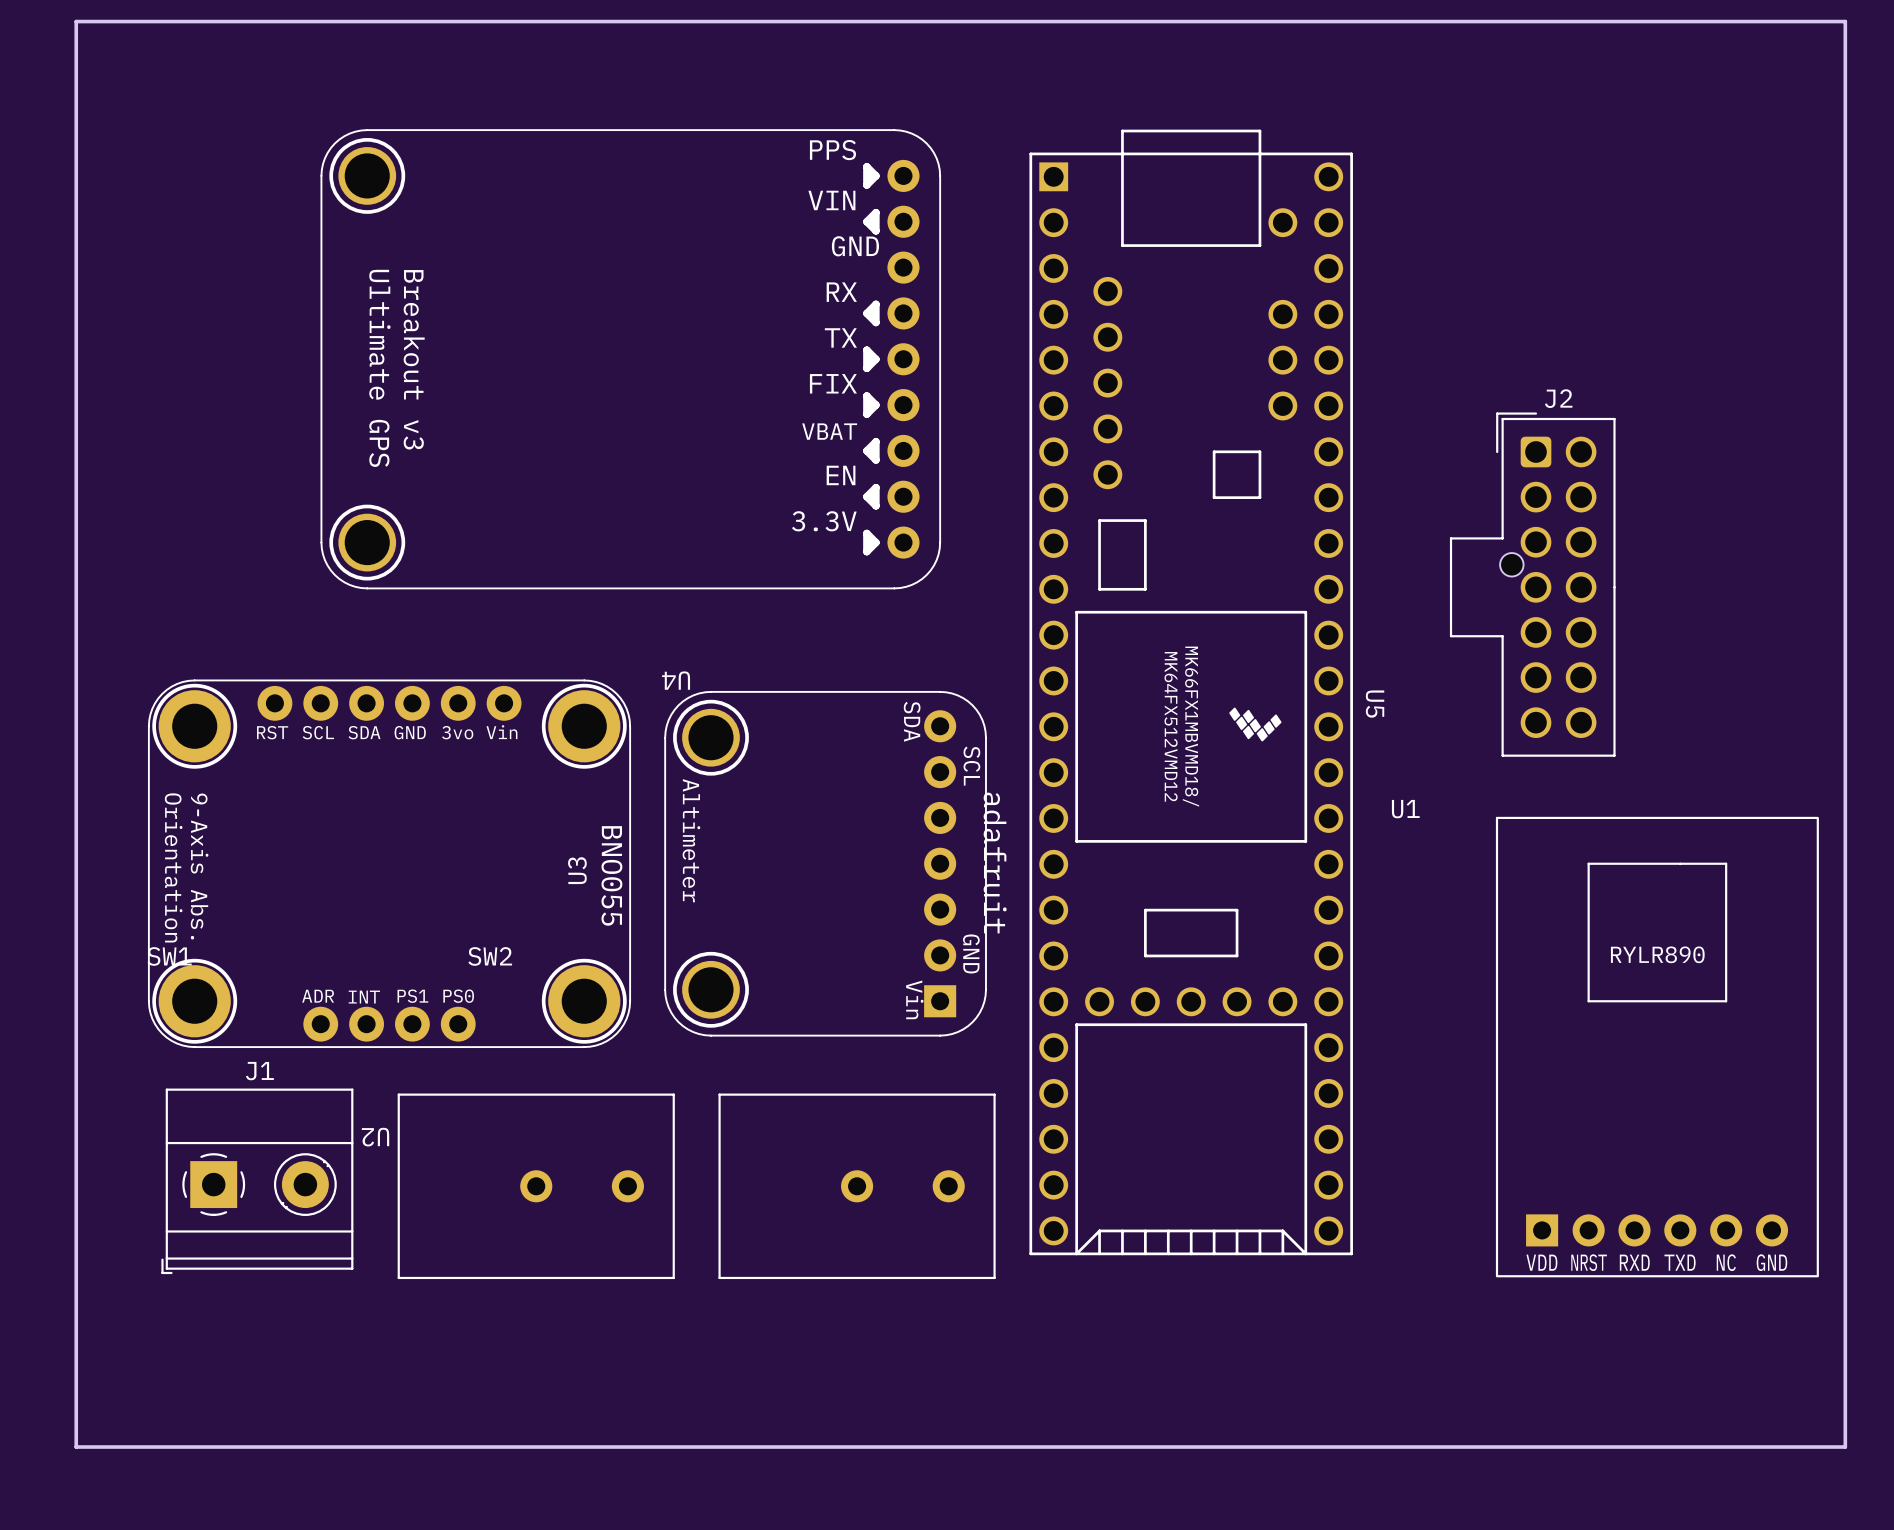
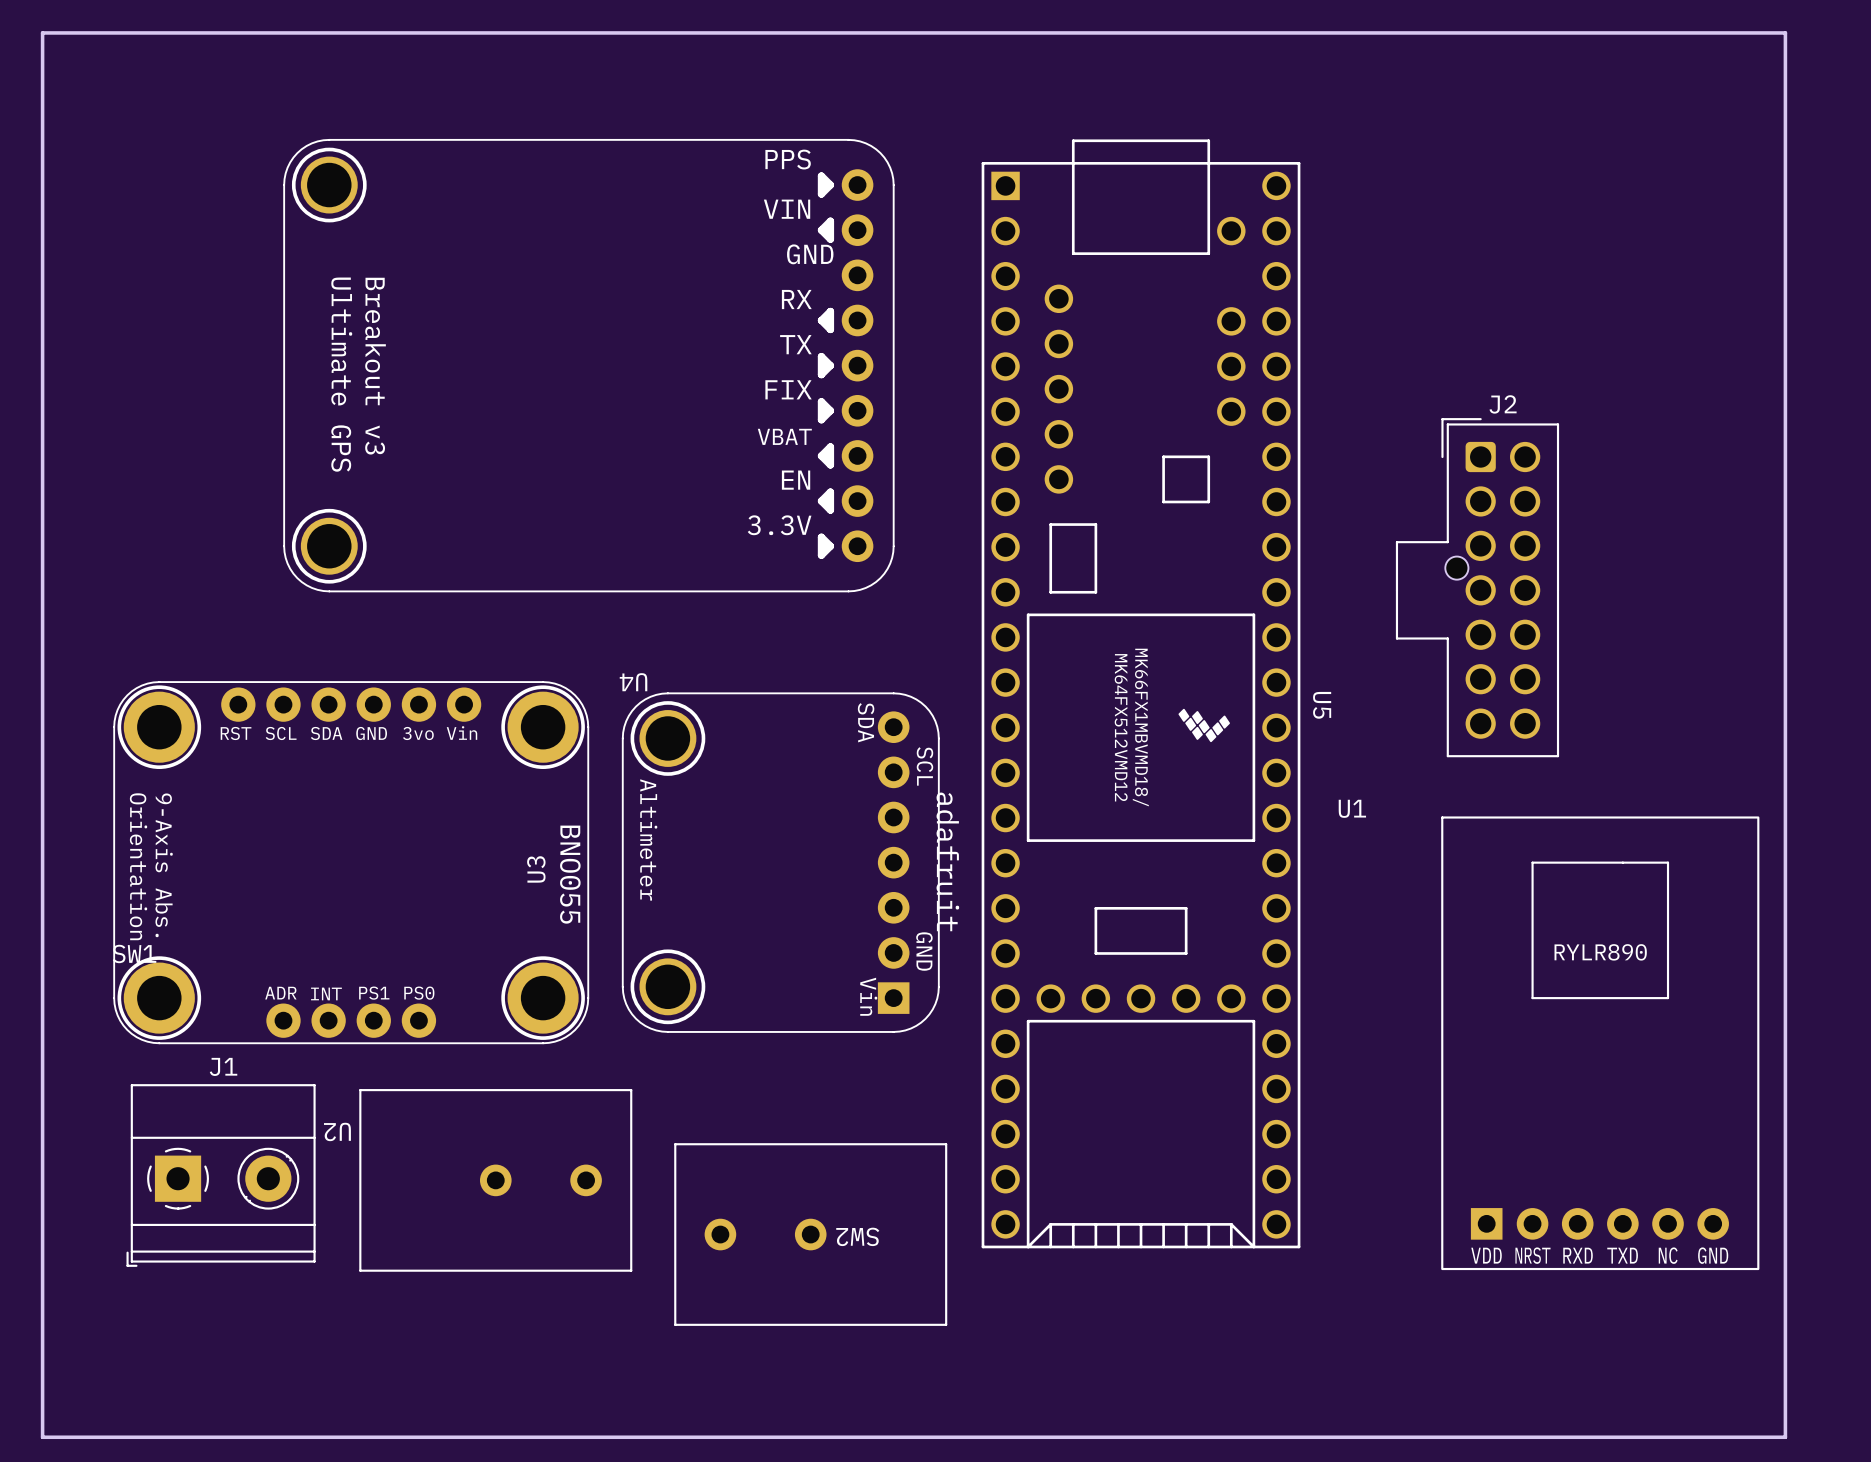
SW2 name position: SW2 (490, 956) -> SW2 (857, 1236)
SW2 rotation: 0° (857, 1186) -> 180° (810, 1234)

